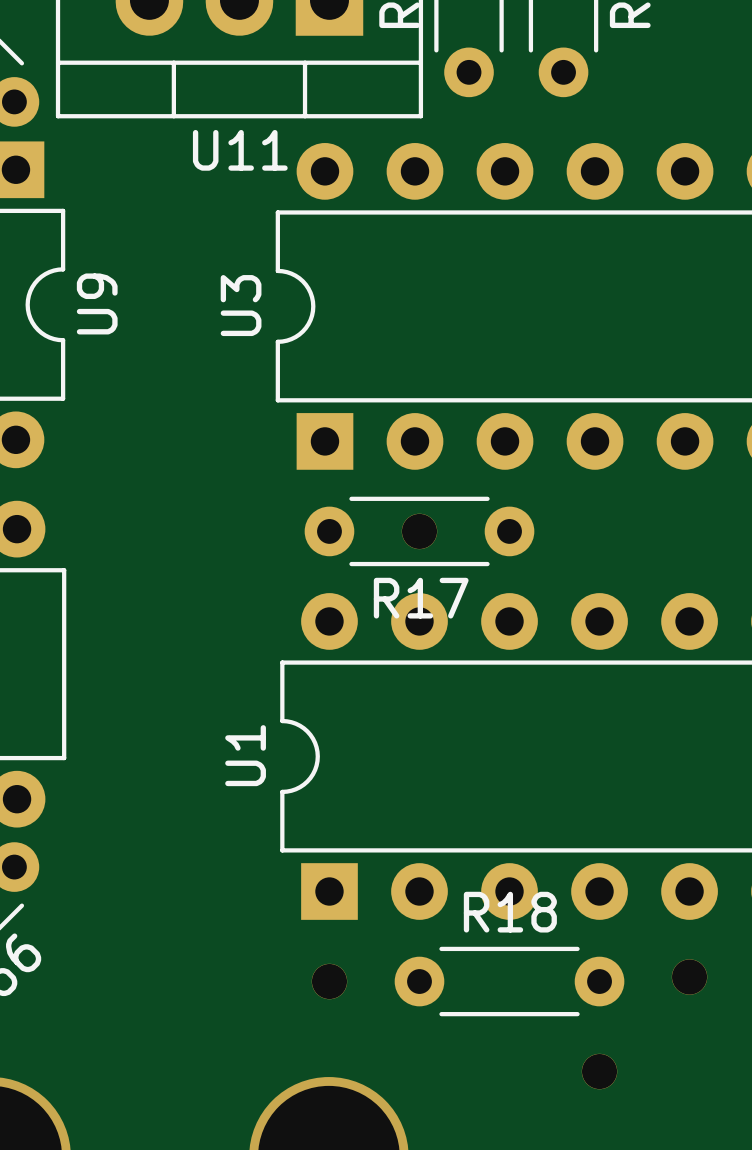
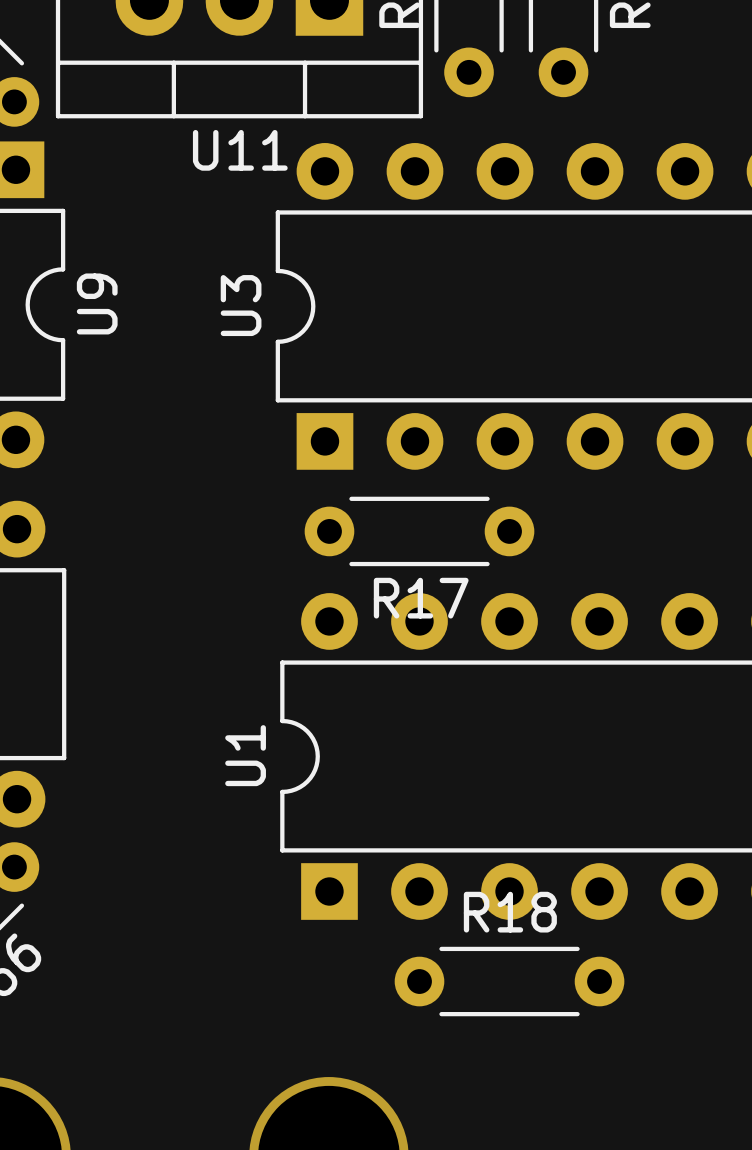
via: (419, 531) -> none
via: (689, 977) -> none
via: (329, 981) -> none
via: (599, 1071) -> none

